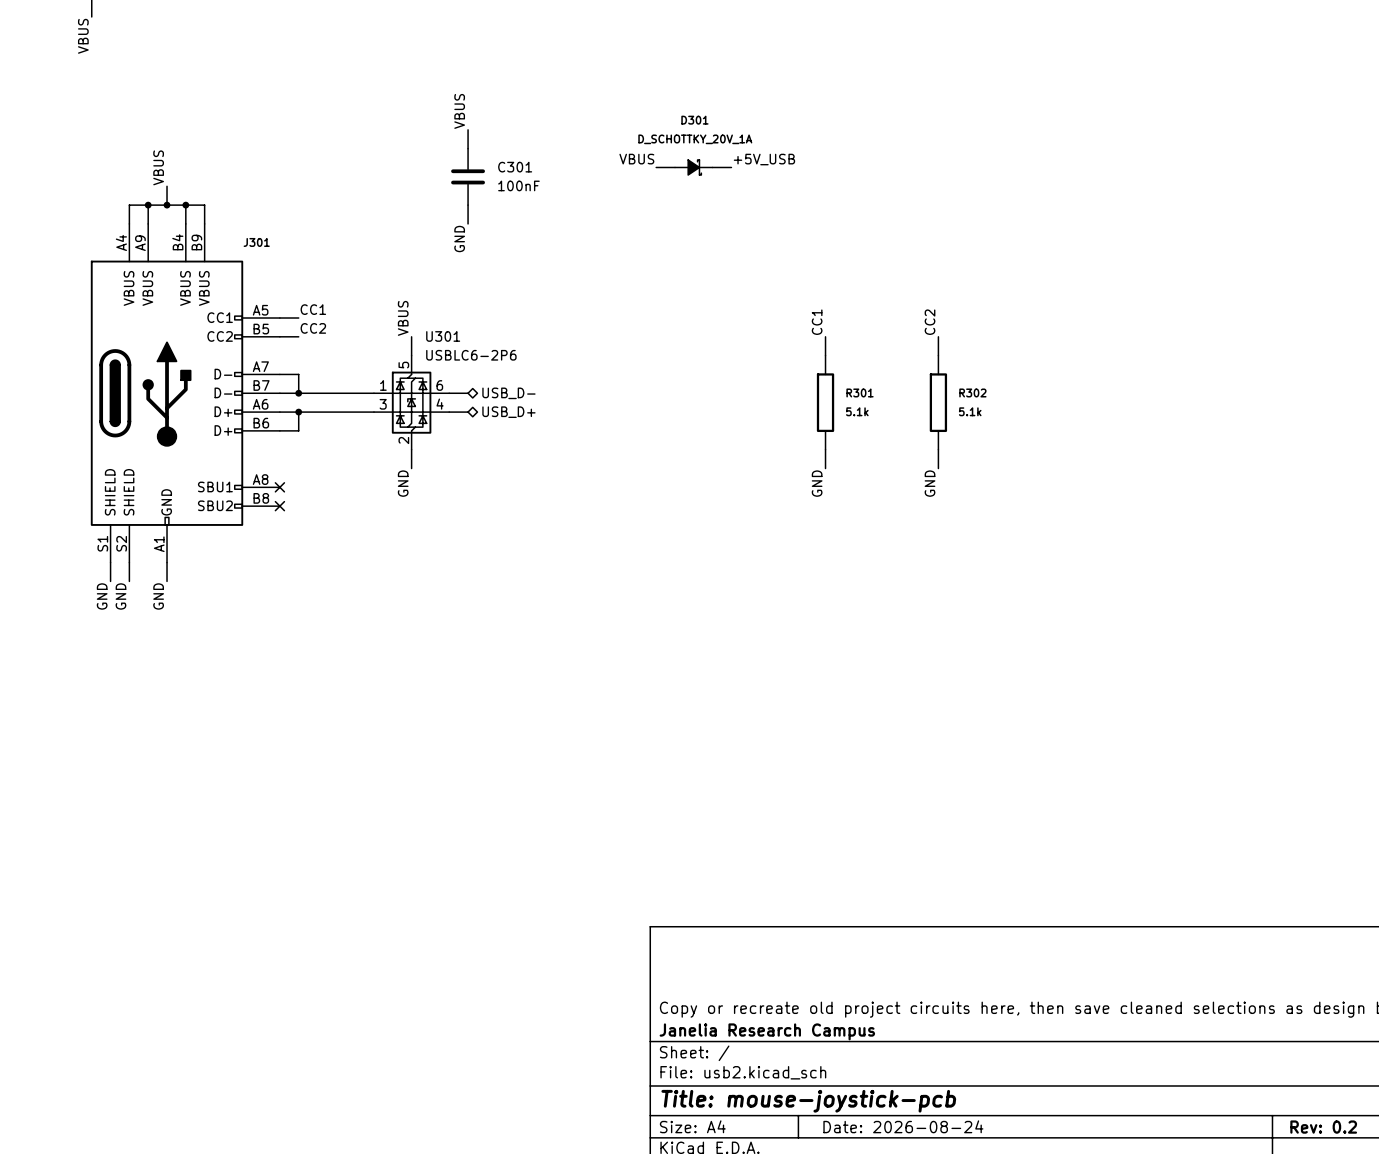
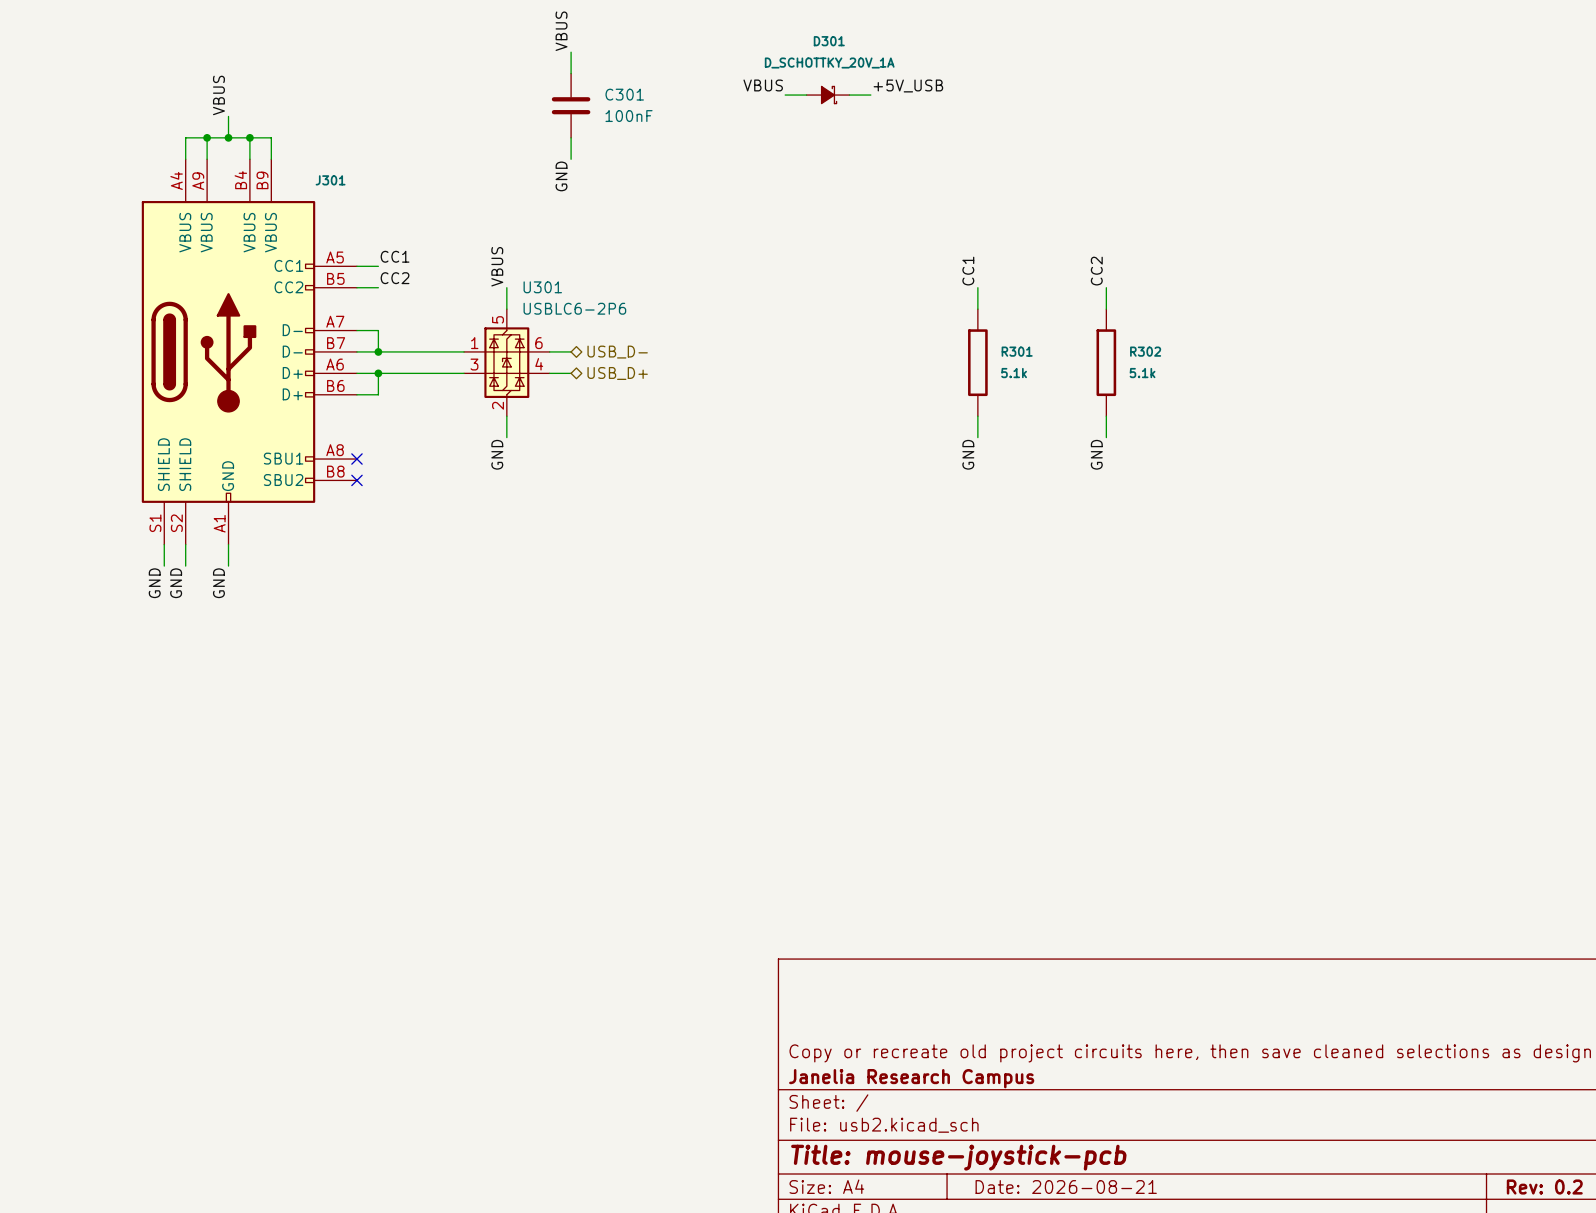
title block: Date: 2026-08-24 (903, 1126) -> Date: 2026-08-21 (1066, 1187)

